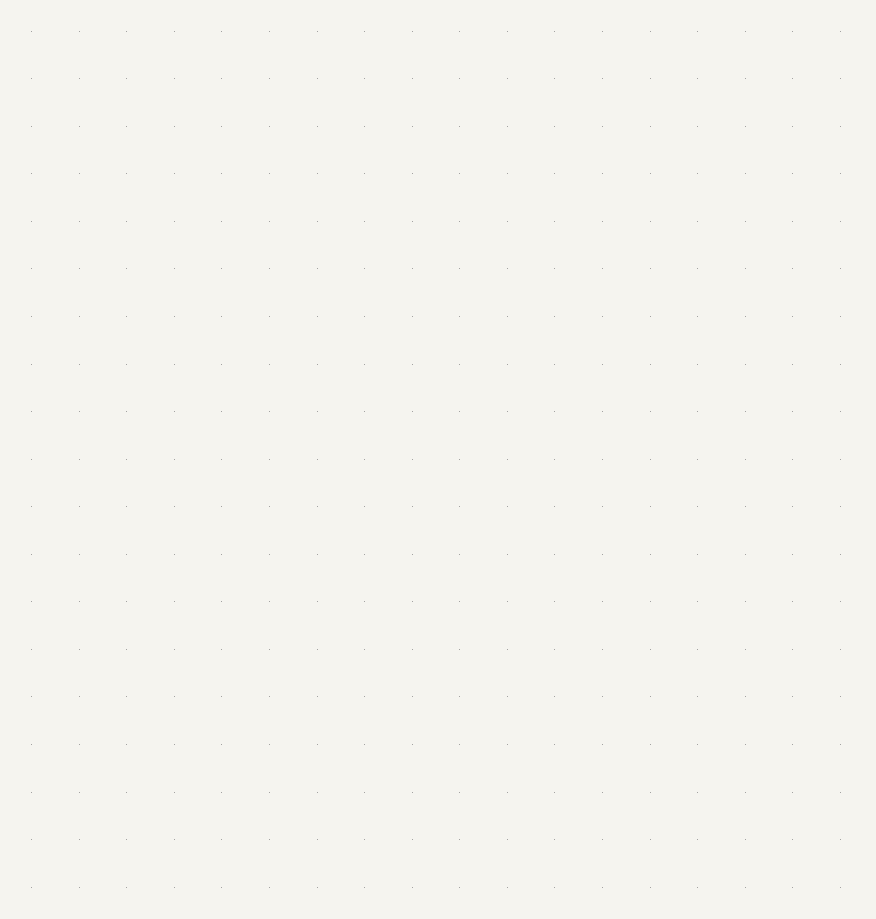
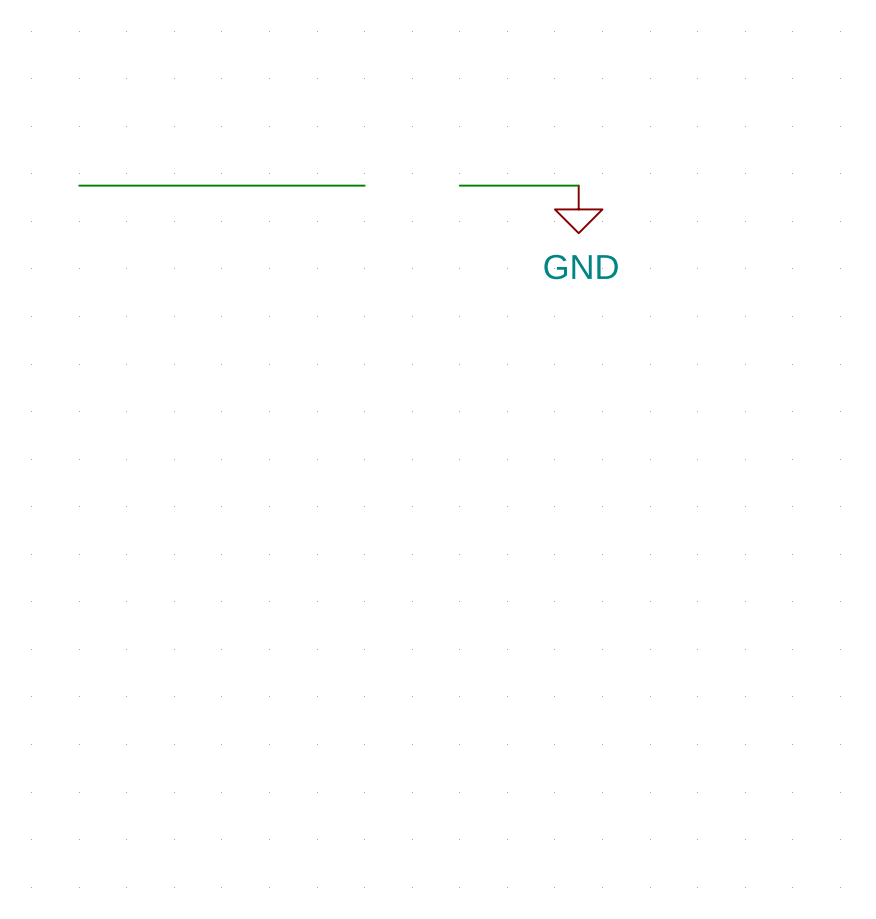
wire: none -> (79, 185) (364, 185)
wire: none -> (459, 185) (578, 185)
power symbol: none -> GND (578, 209)

